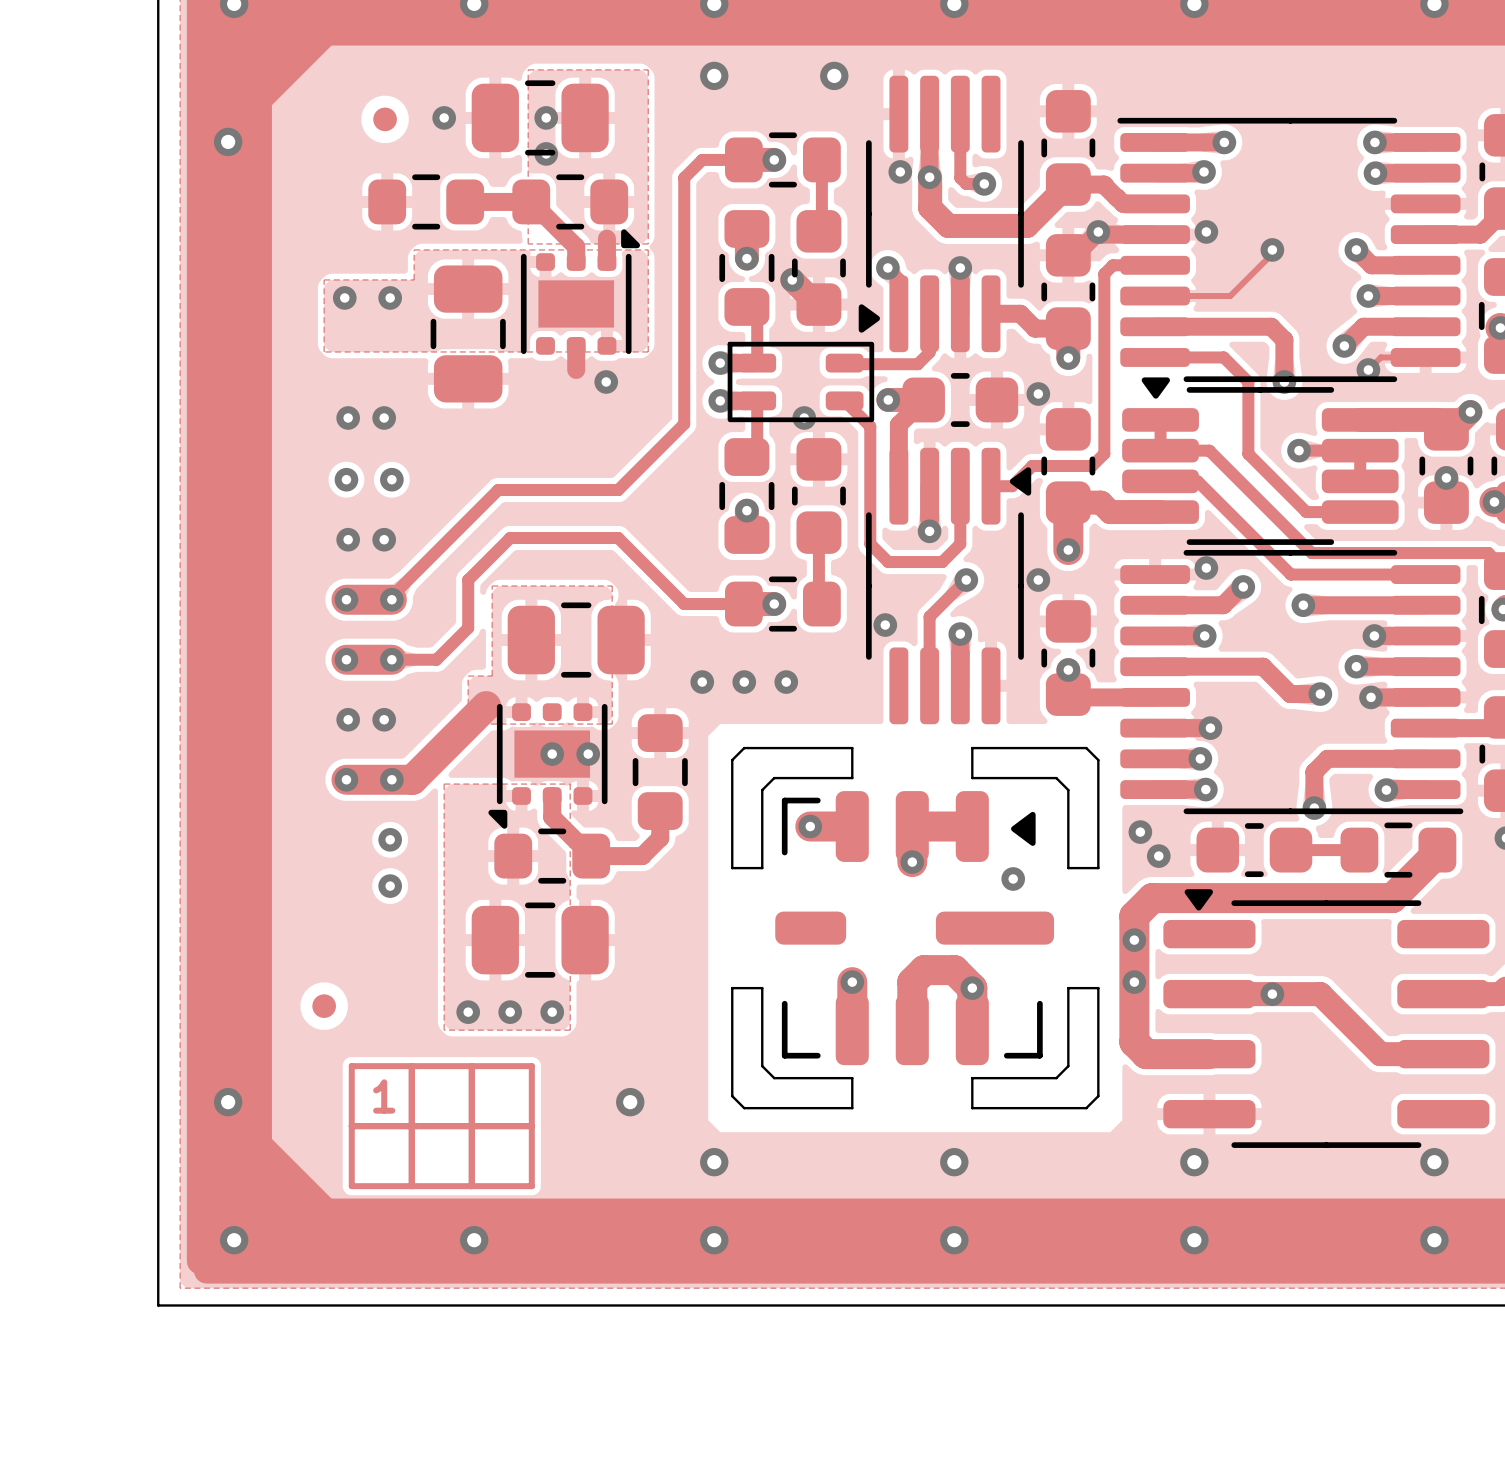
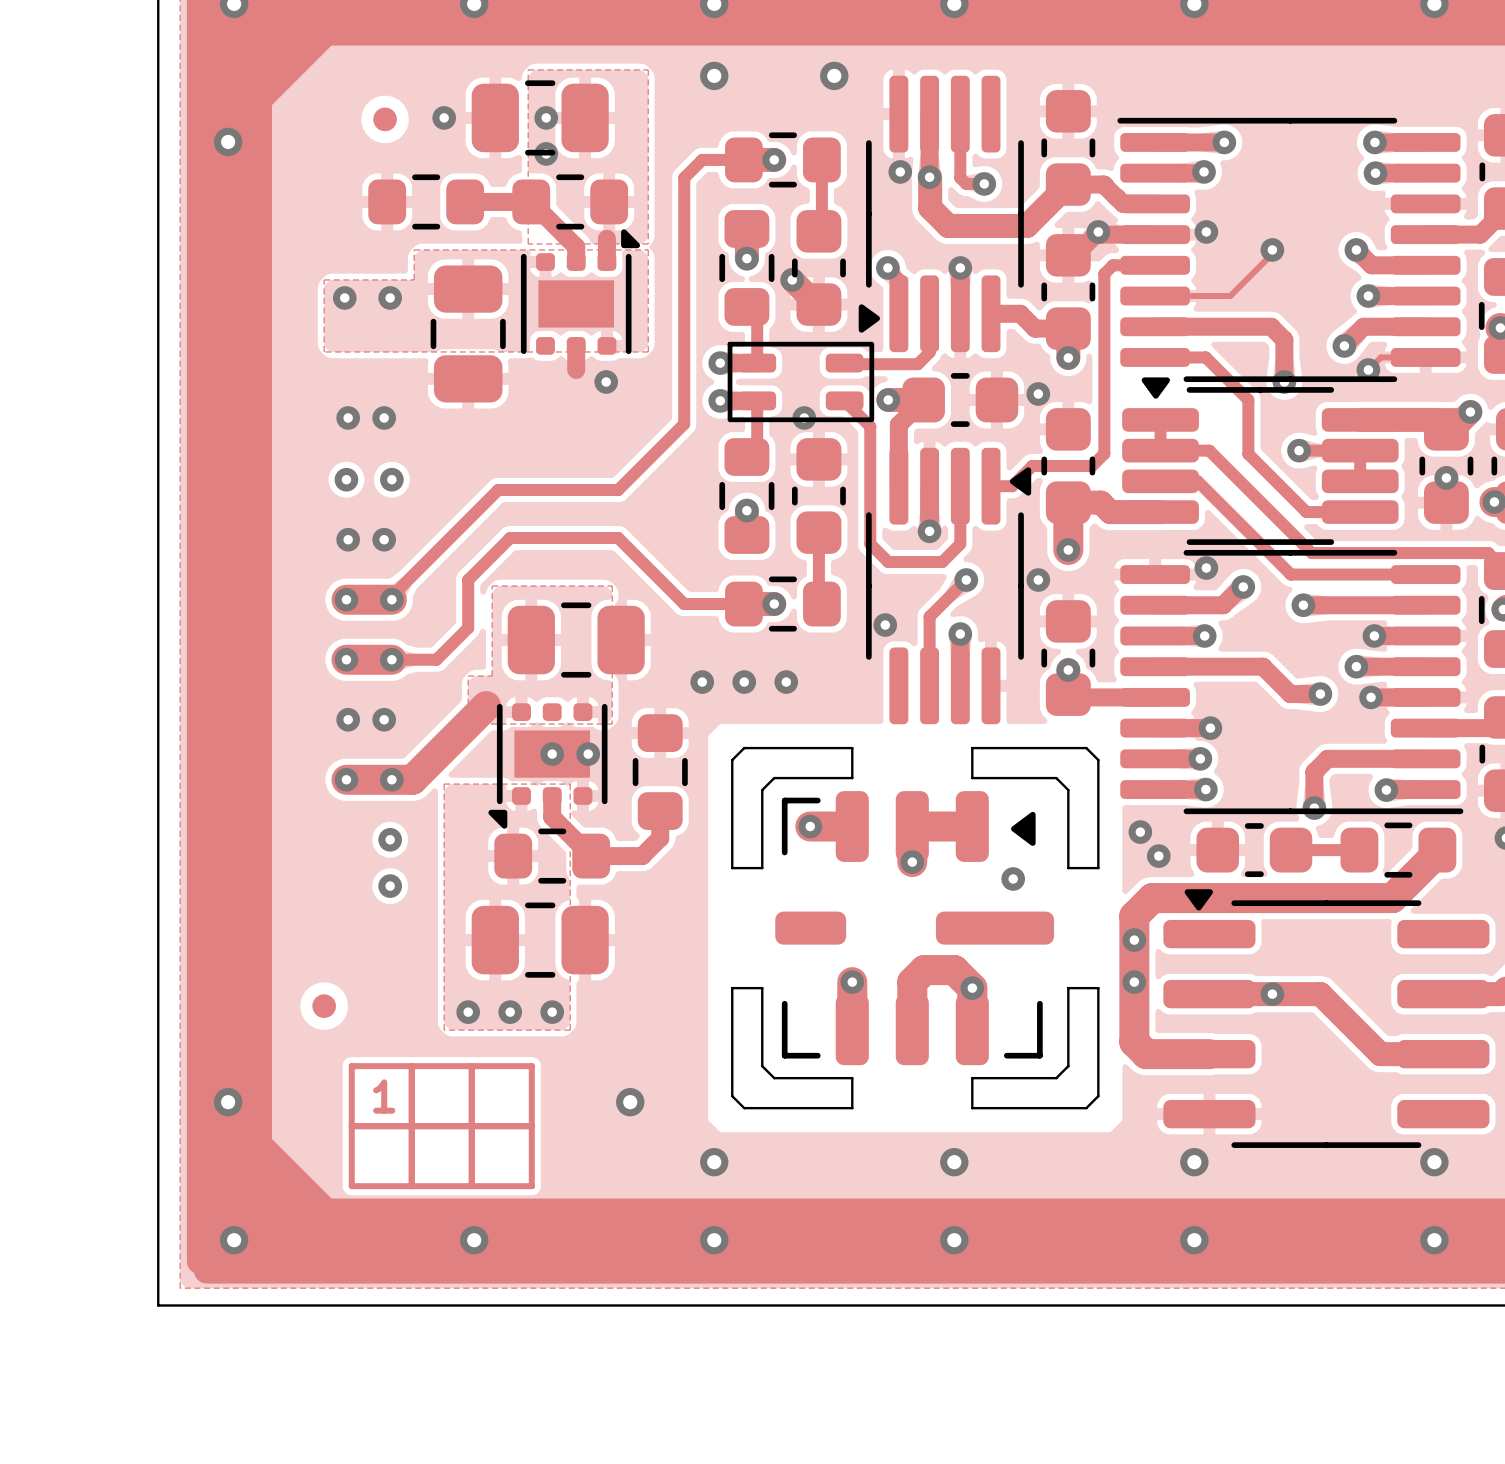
track: (1205, 357) (1223, 357) (1248, 381) (1248, 399) -> (1205, 357) (1248, 399)

